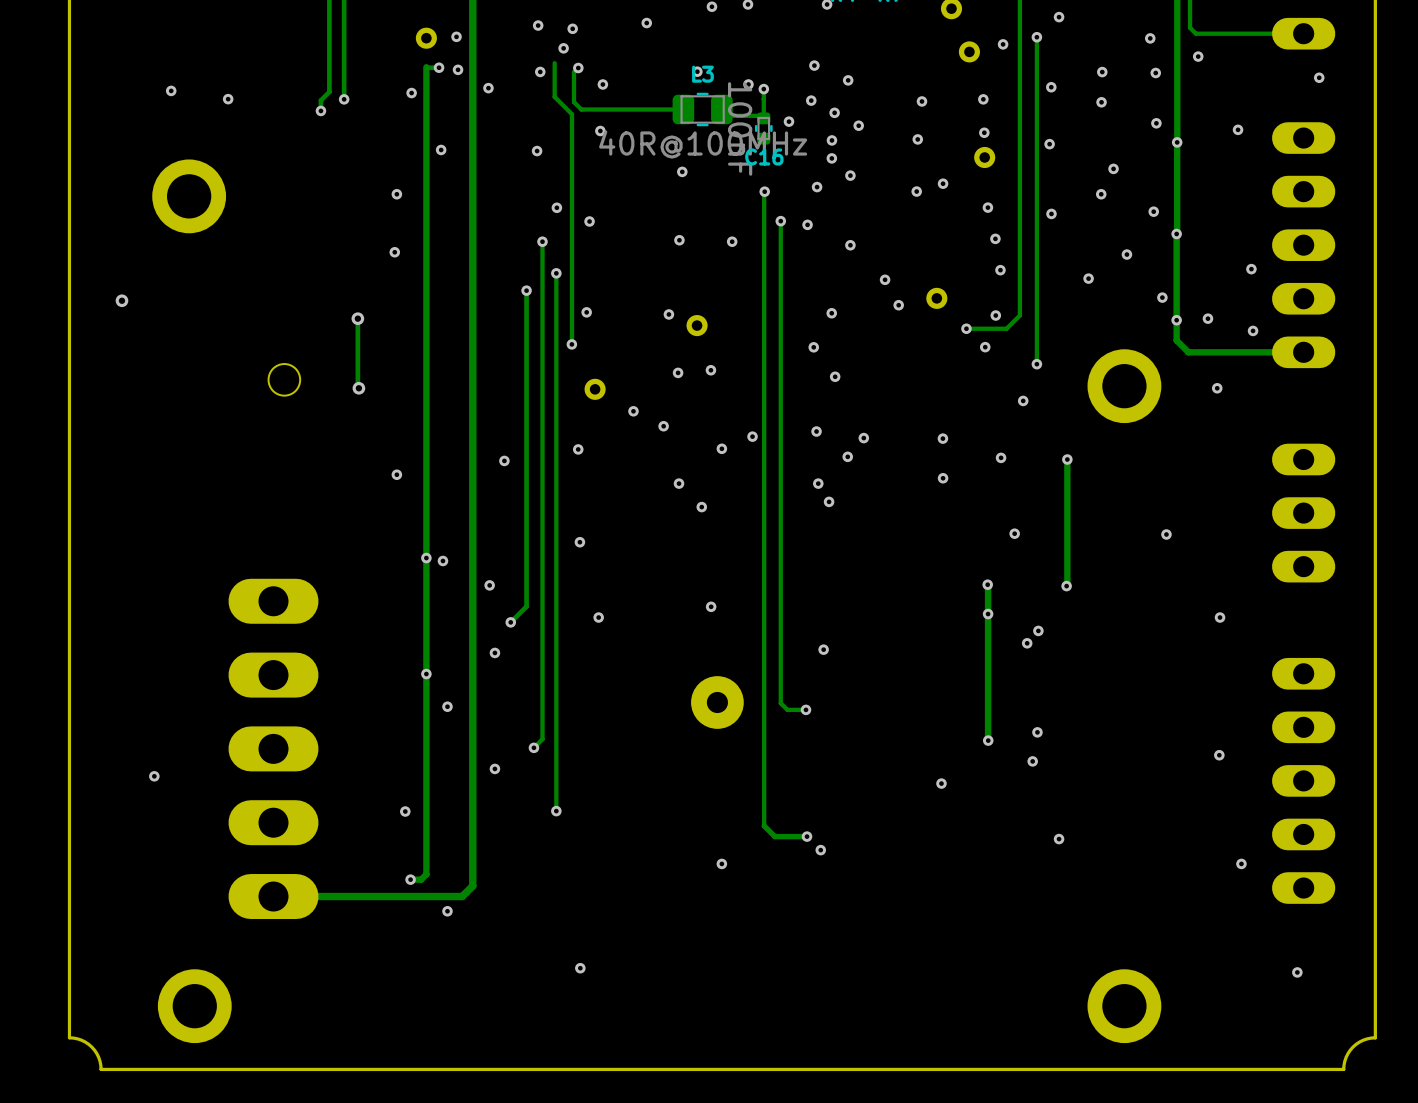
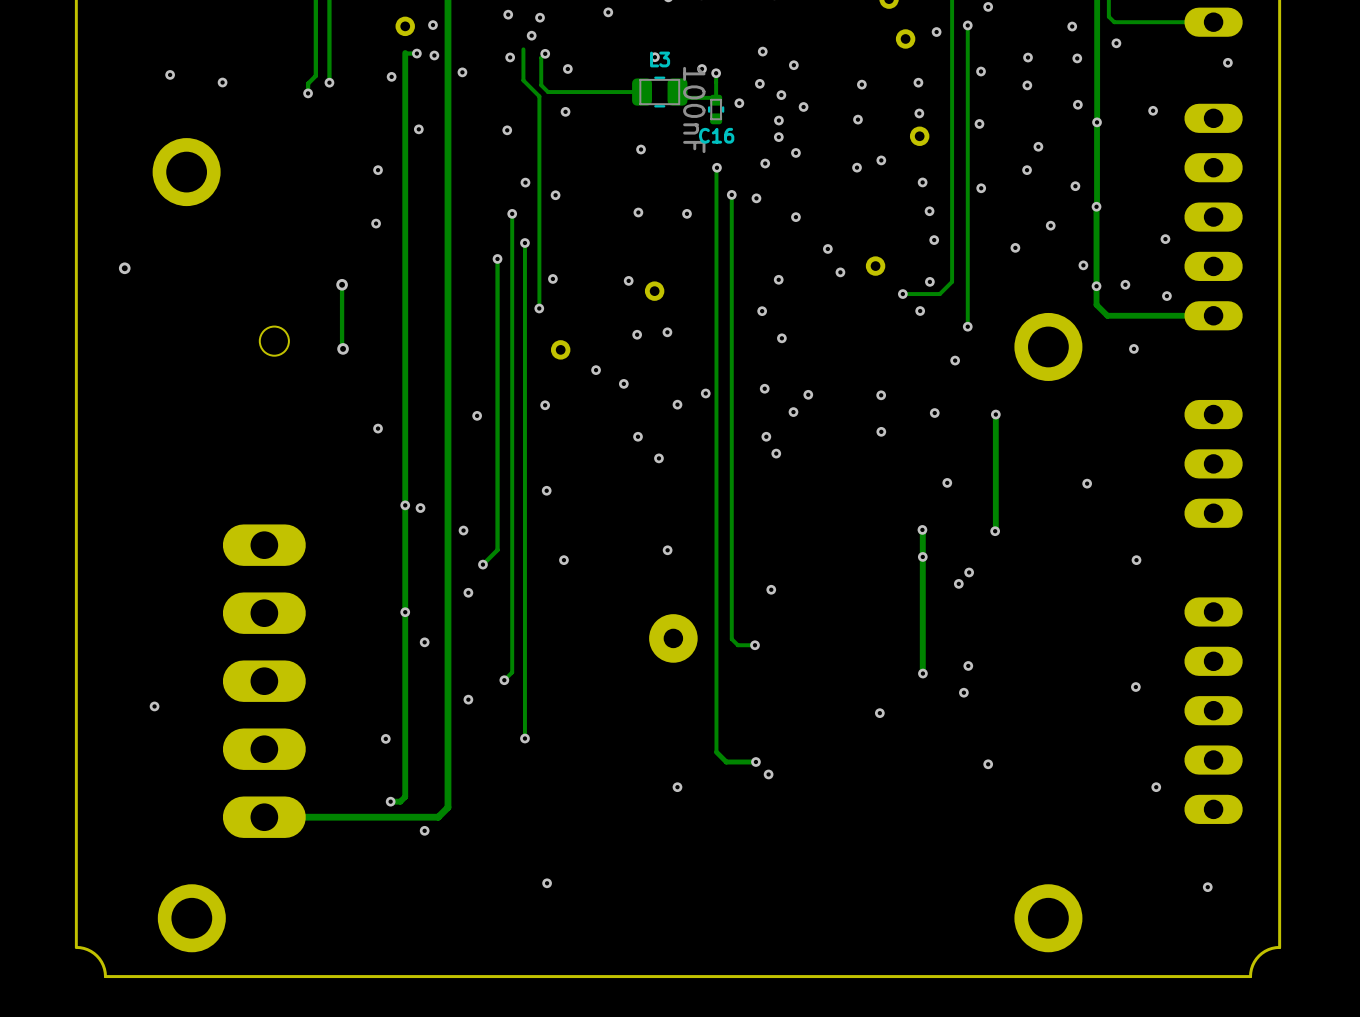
L3 value: 40R@100MHz (703, 144) -> none

